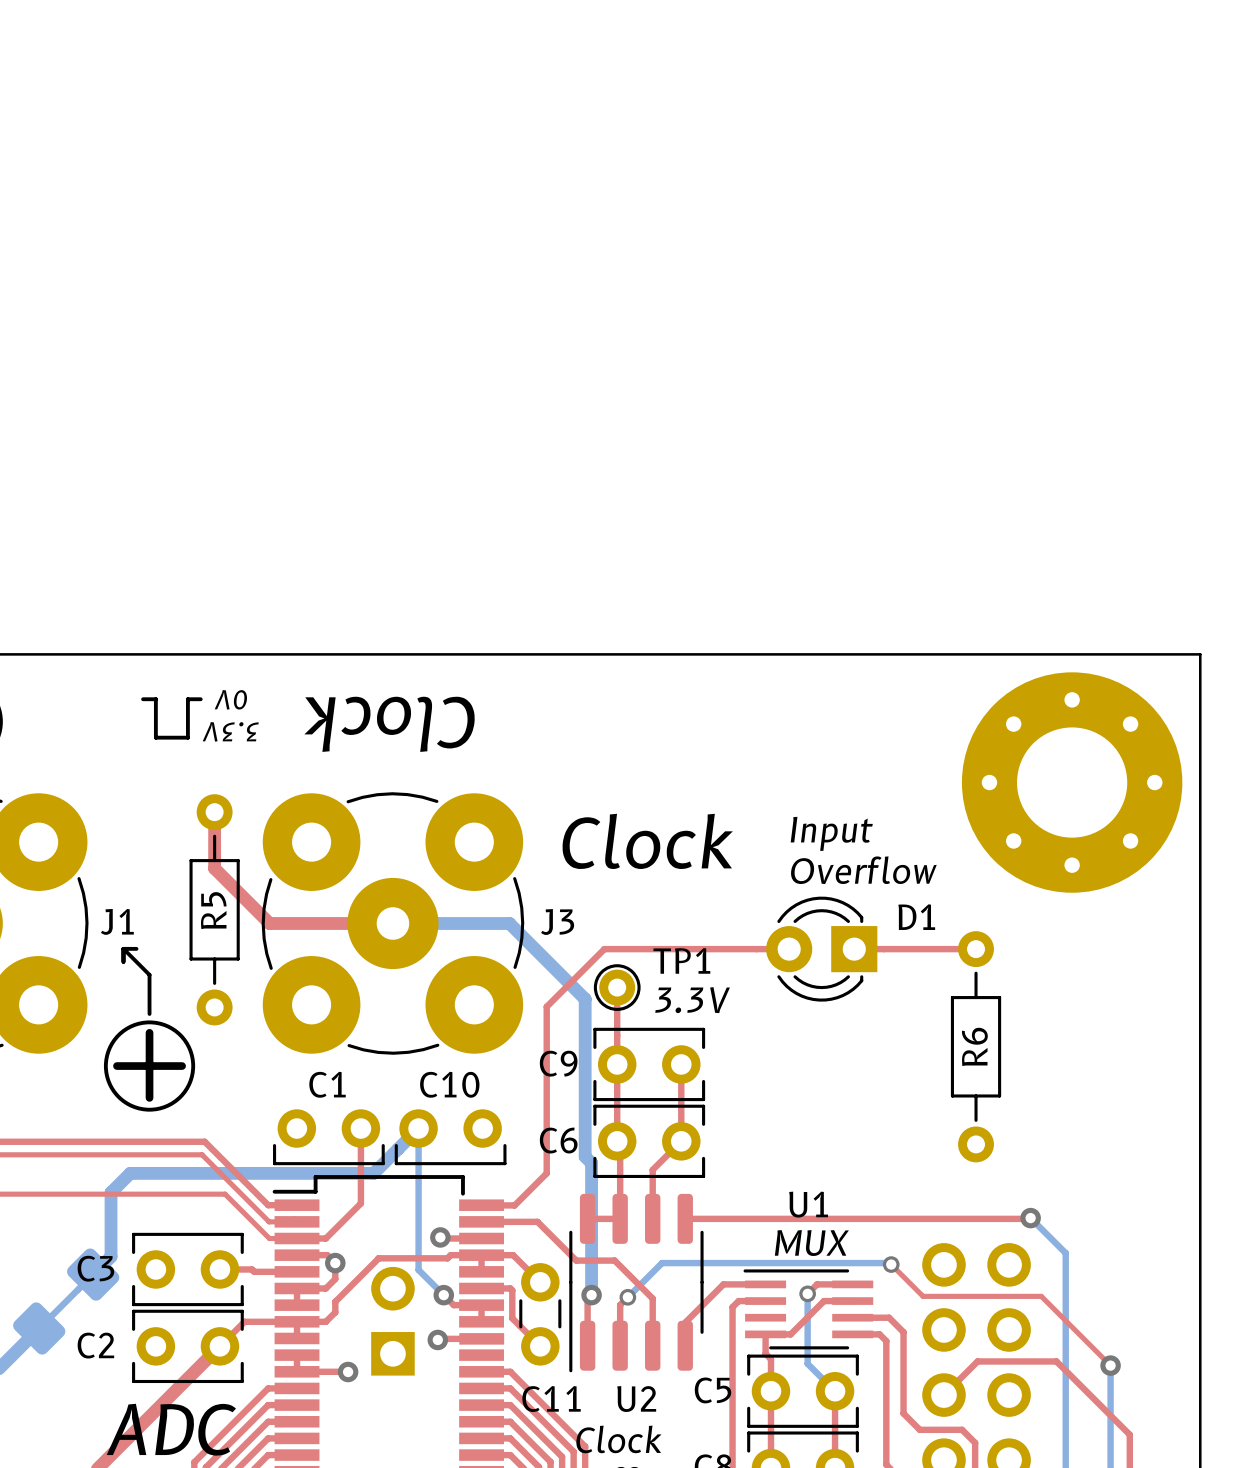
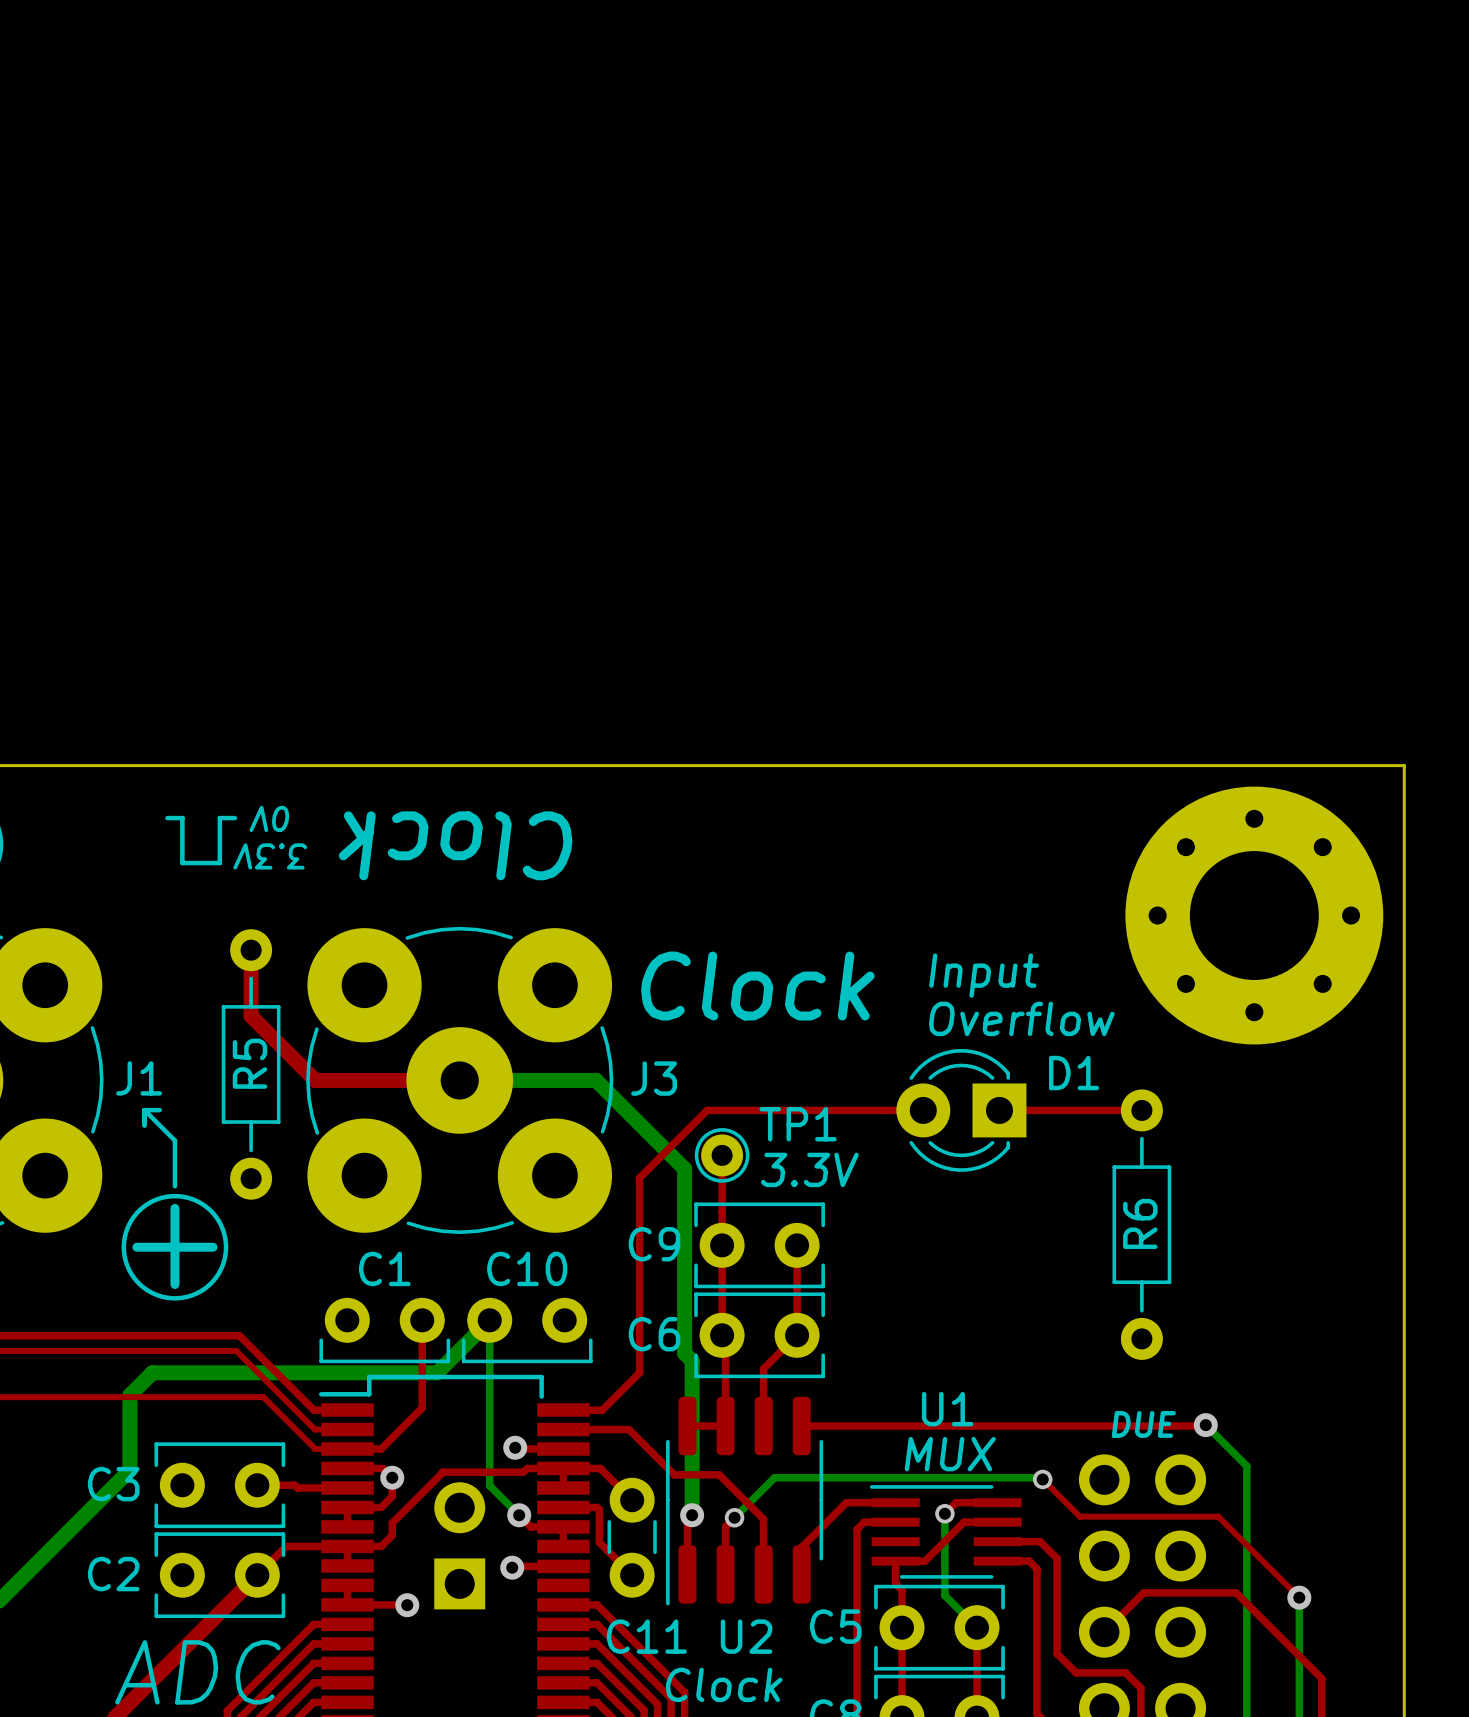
text: none -> DUE (1143, 1424)
bottom track width: thin (84, 1283) (39, 1328) -> thick (98, 1501) (45, 1554)
part: (66, 1301) -> none

